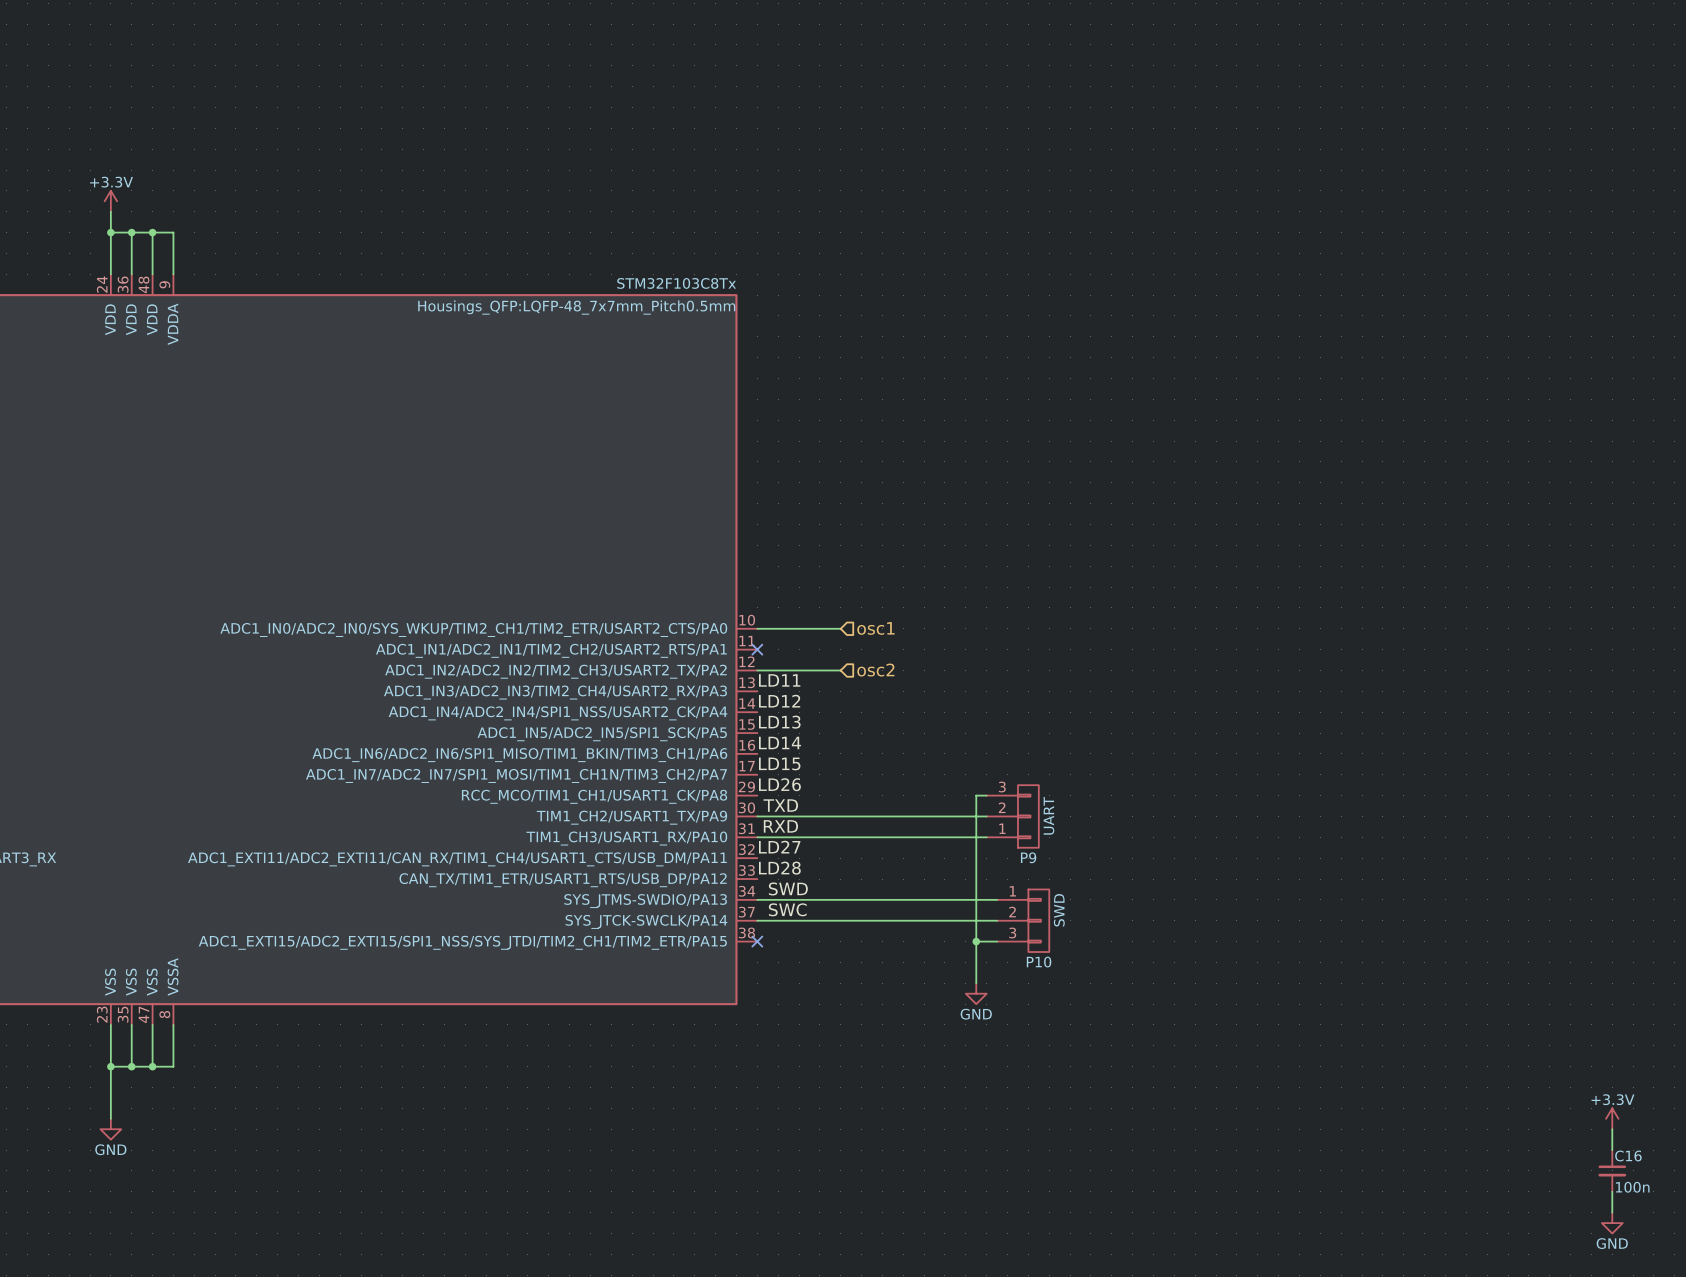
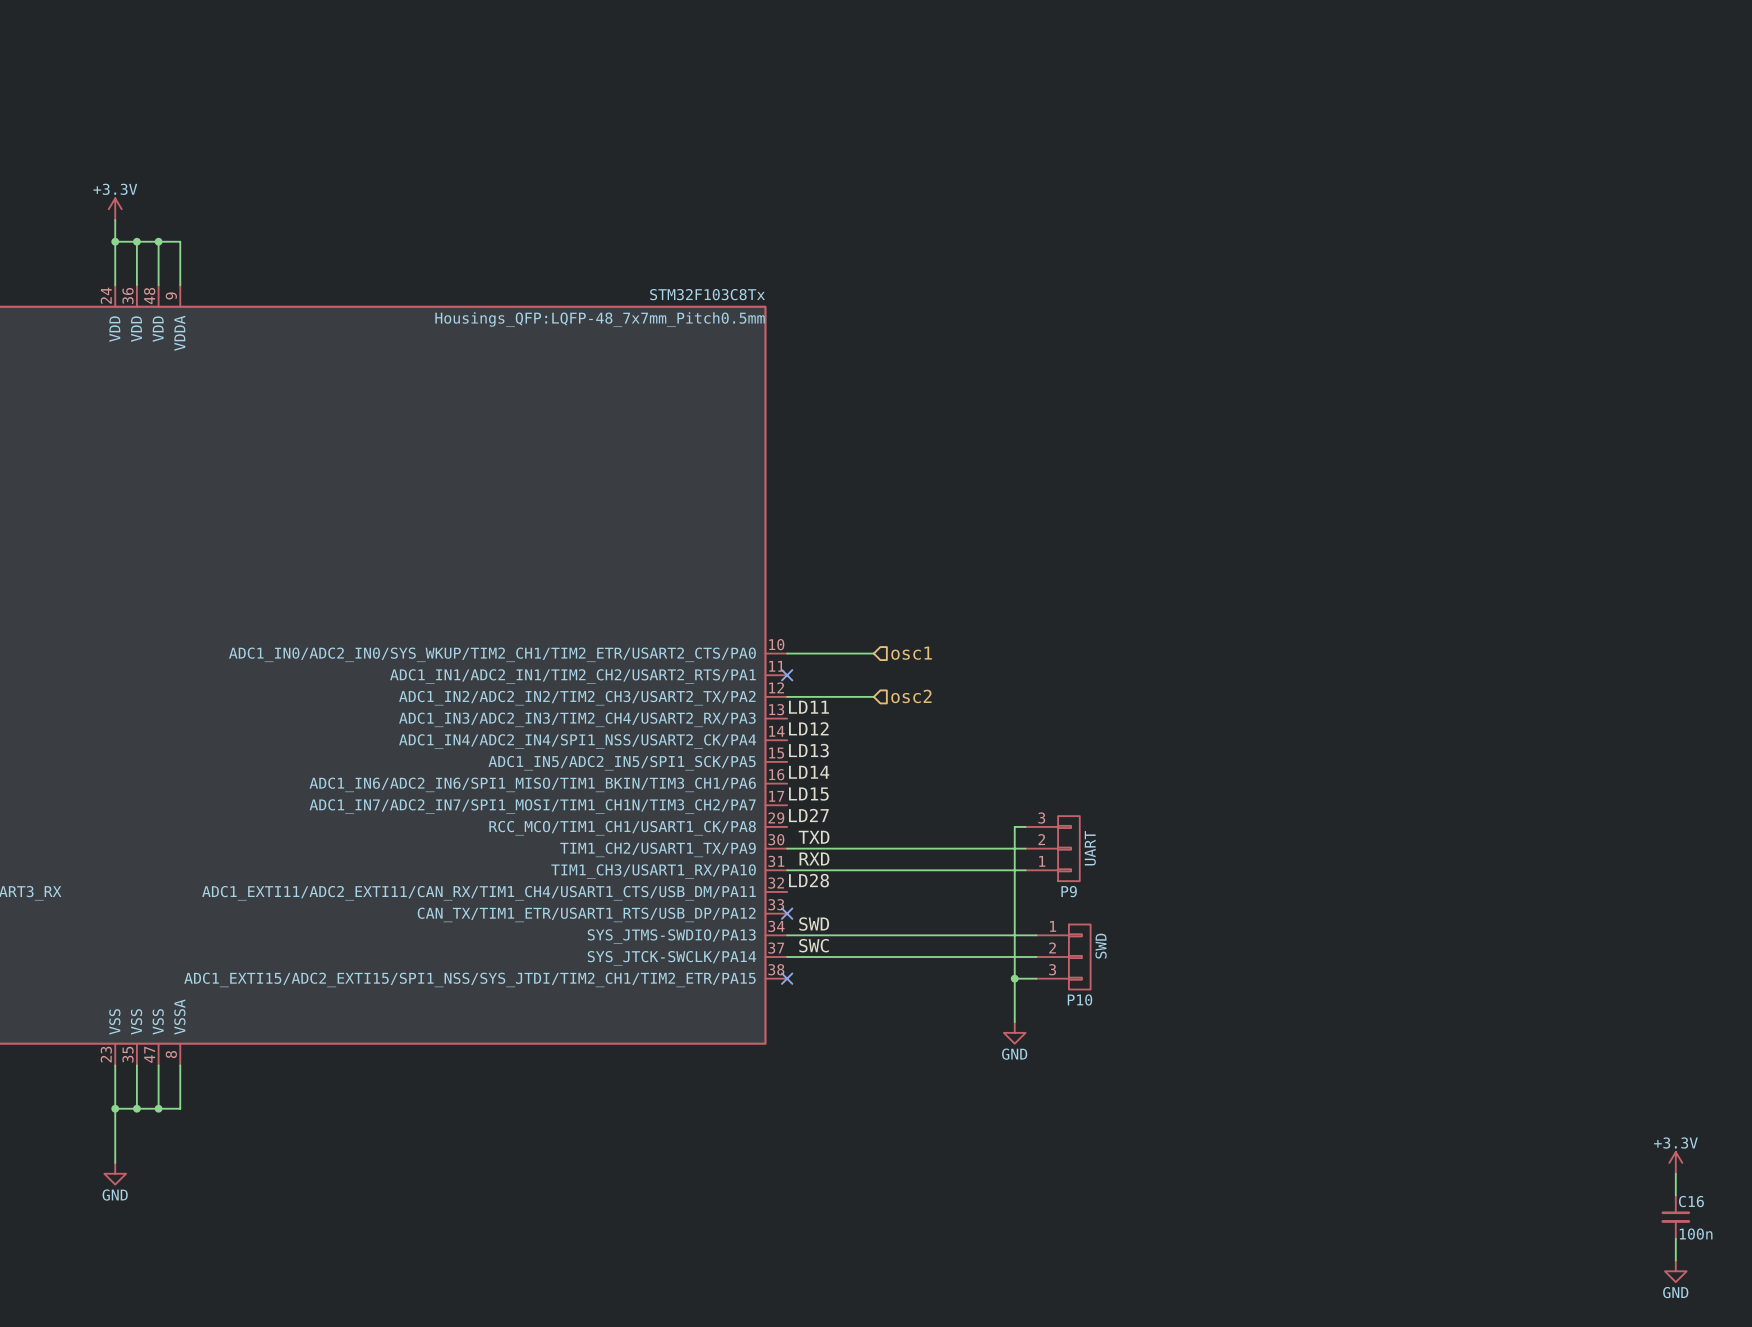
label: LD26 (779, 784) -> LD27 (808, 815)
label: LD27 (779, 847) -> LD28 (809, 880)
label: LD28 (779, 868) -> none
no-connect mark: none -> (787, 913)

